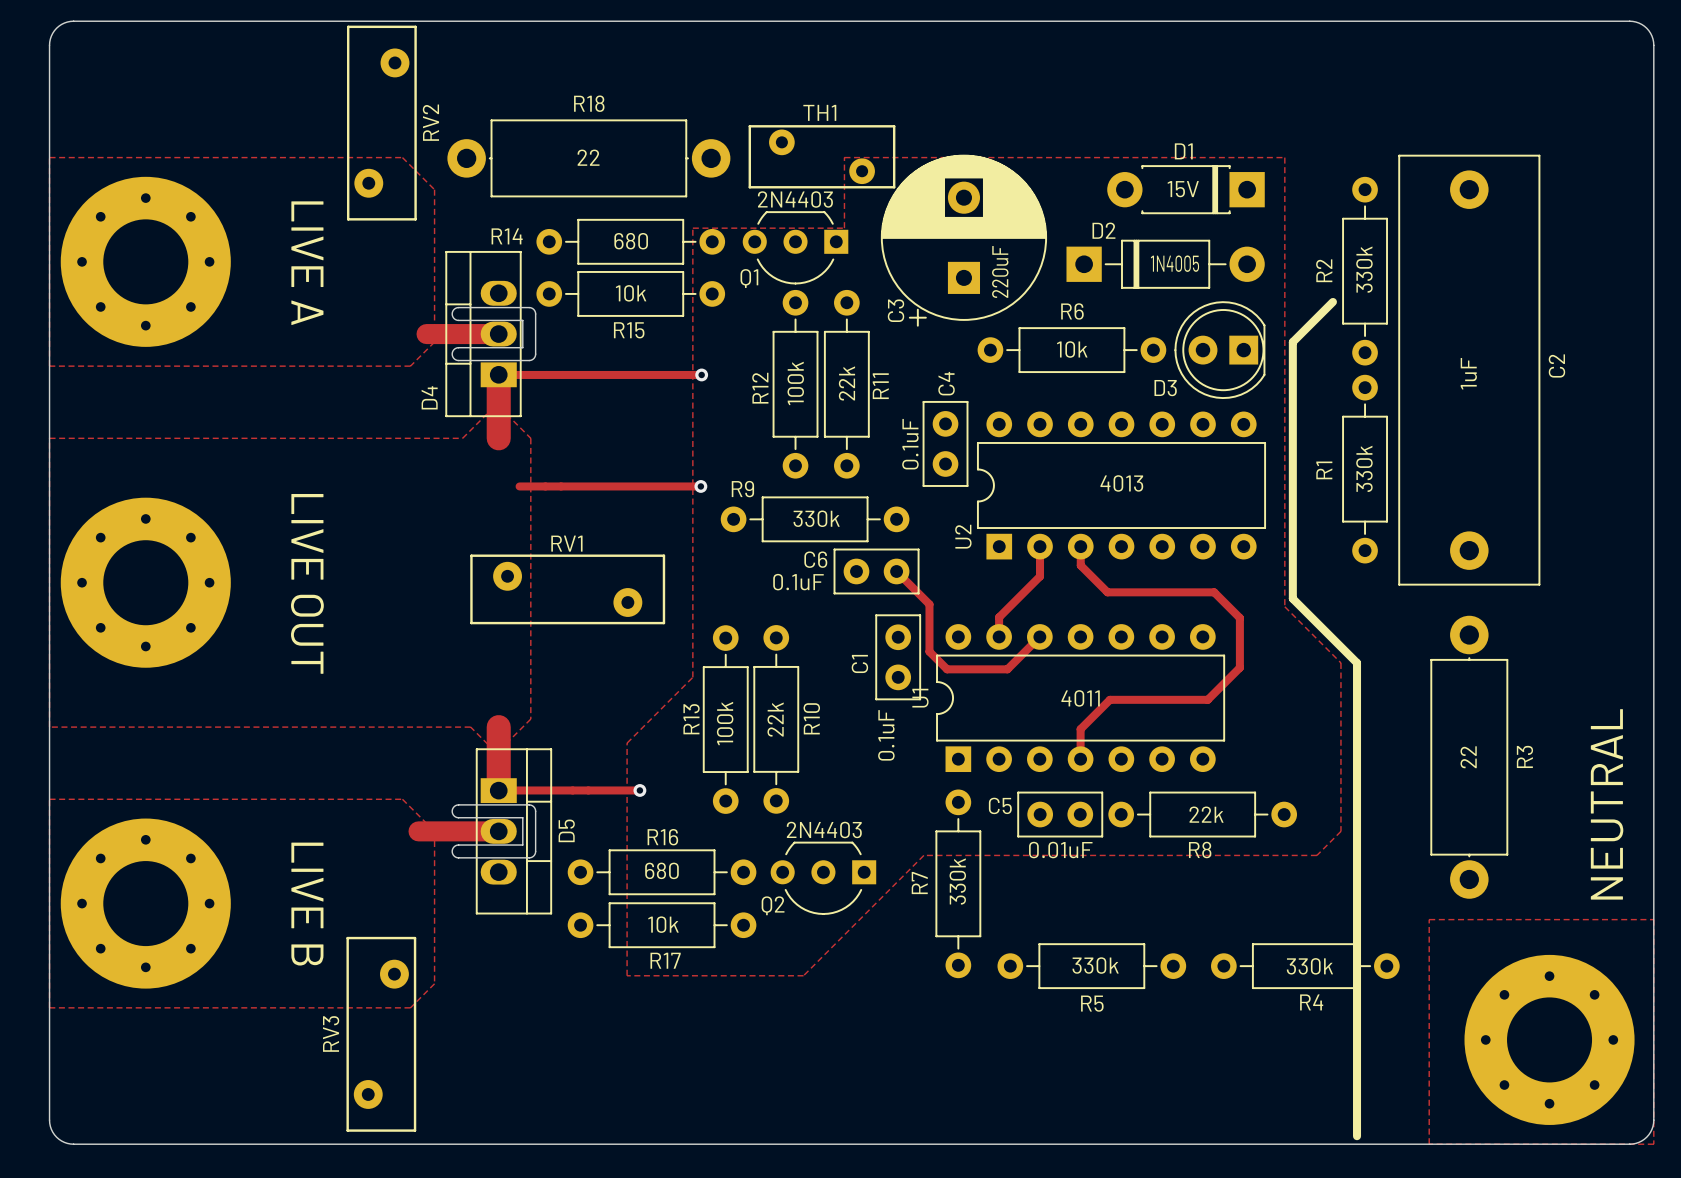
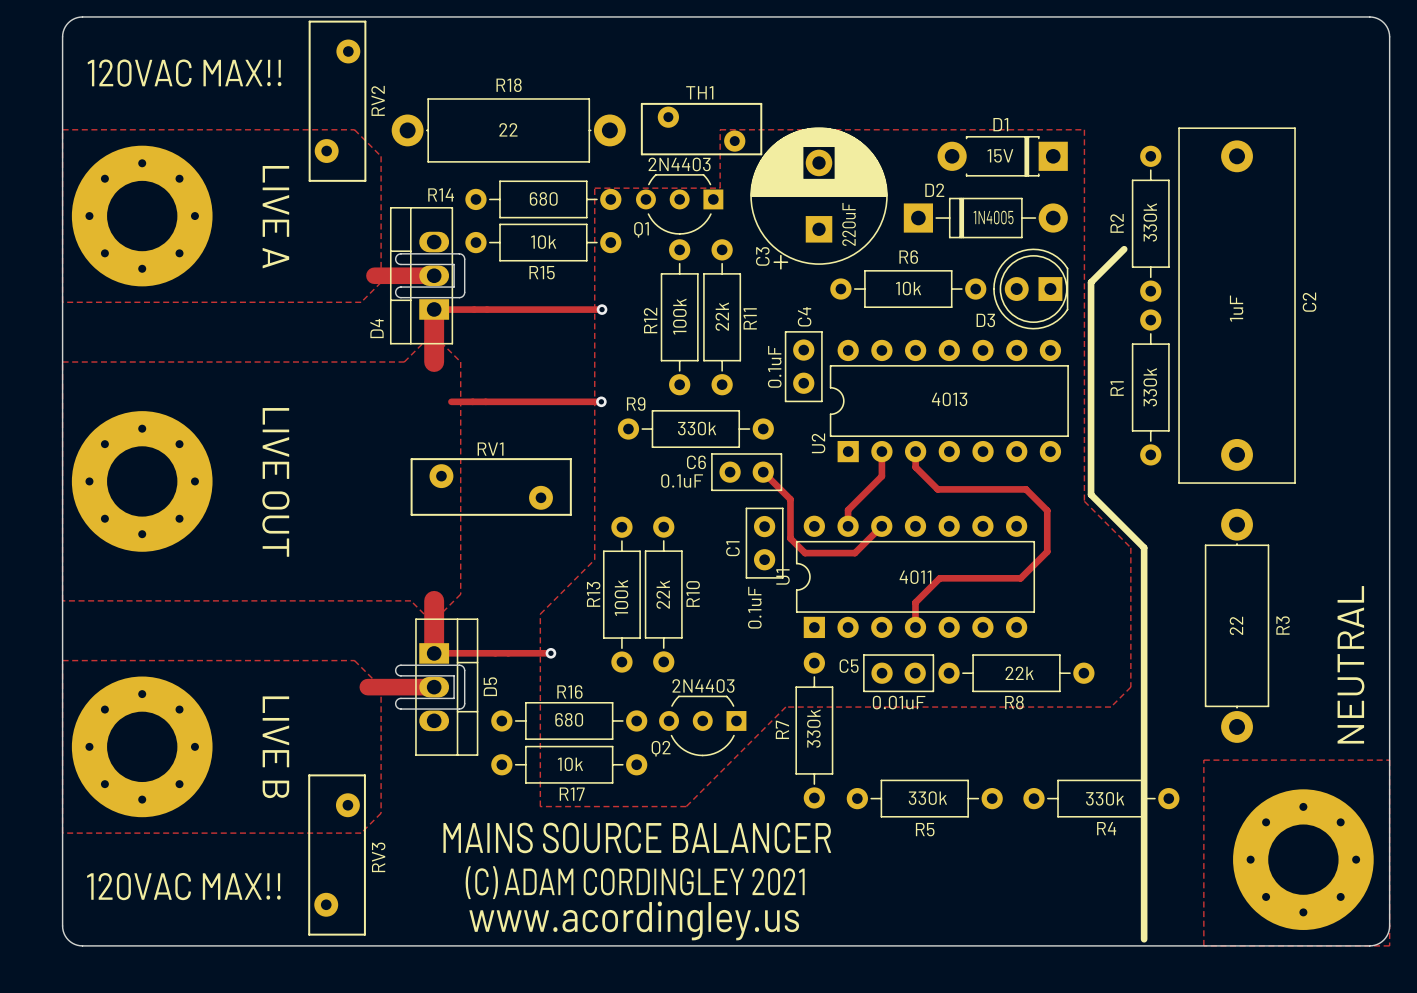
text: none -> 120VAC MAX!! (184, 73)
text: none -> MAINS SOURCE BALANCER (637, 837)
RV3 name position: RV3 (331, 1033) -> RV3 (378, 857)
text: none -> (C) ADAM CORDINGLEY 2021 (635, 882)
text: none -> 120VAC MAX!! (183, 886)
text: none -> www.acordingley.us (634, 920)

